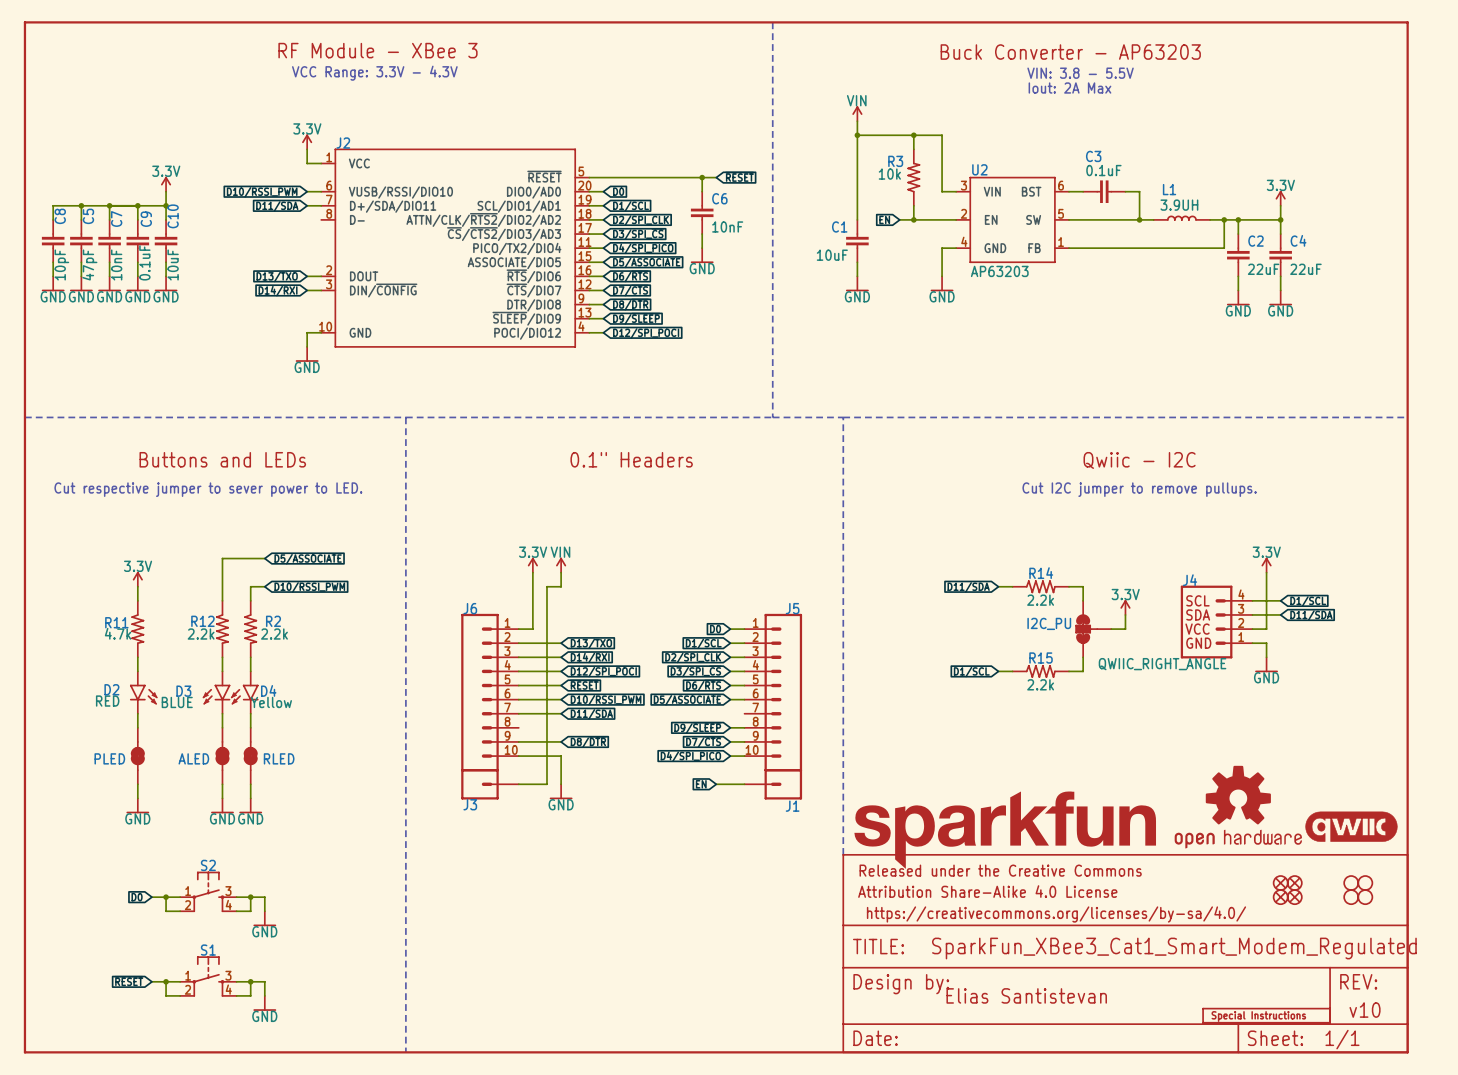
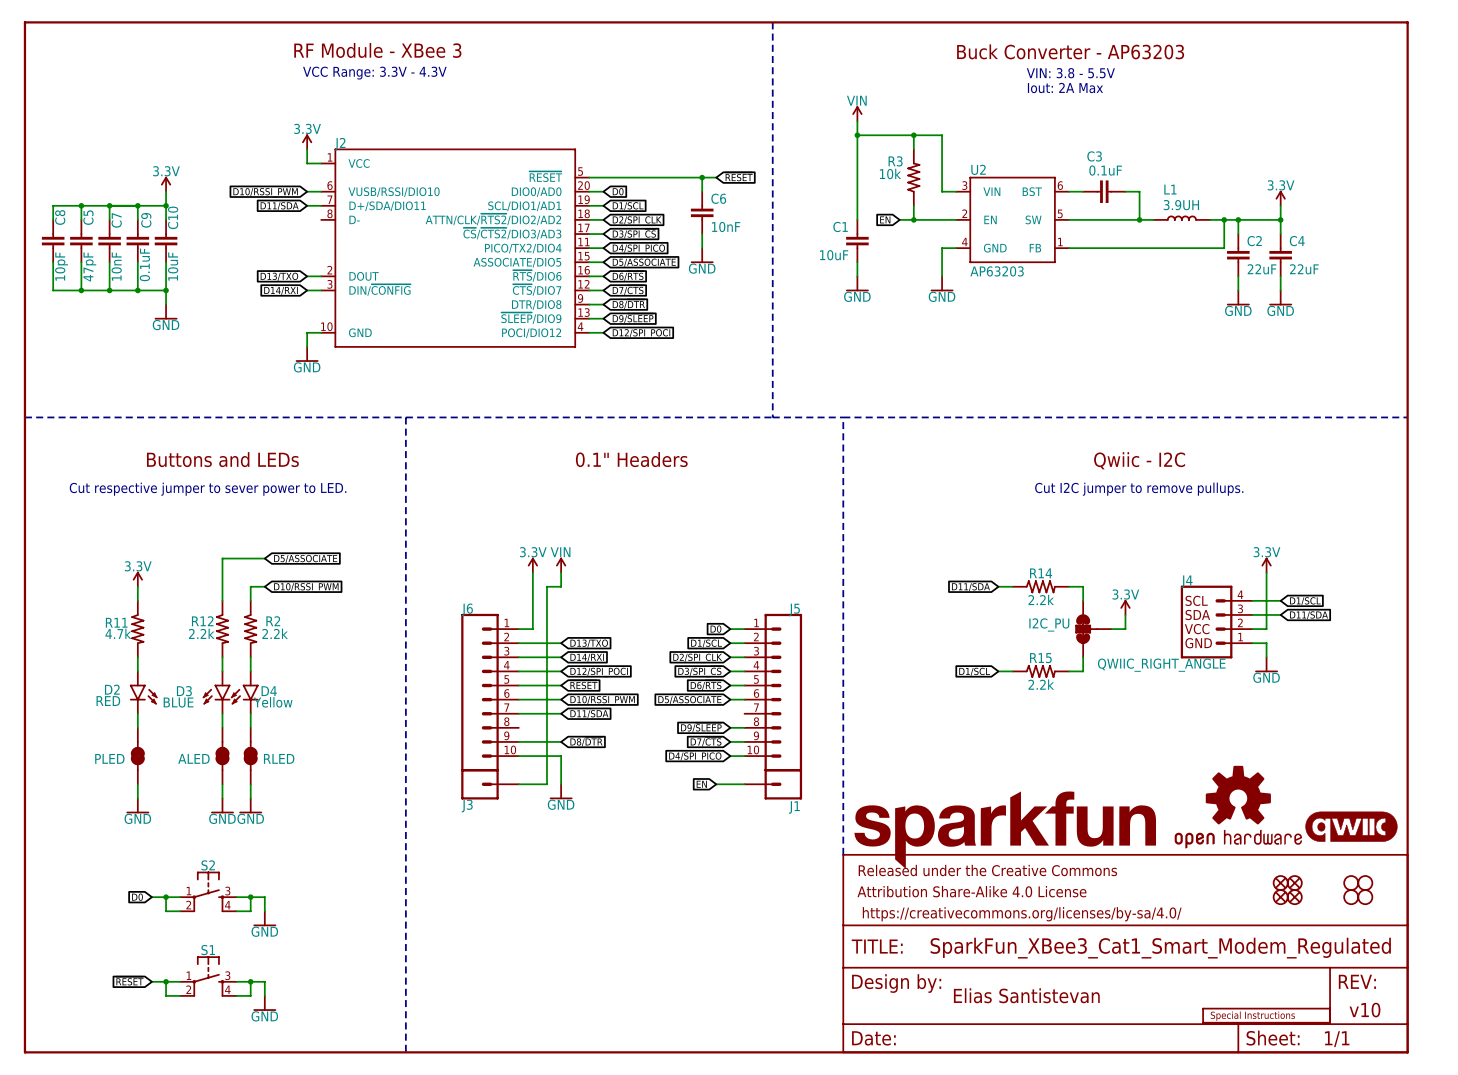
power symbol: GND (53, 283) -> none
power symbol: GND (81, 283) -> none
power symbol: GND (109, 283) -> none
power symbol: GND (137, 283) -> none
power symbol: GND (166, 283) -> none
junction: none -> (81, 290)
junction: none -> (109, 290)
junction: none -> (137, 290)
junction: none -> (166, 290)
power symbol: none -> GND (166, 311)

